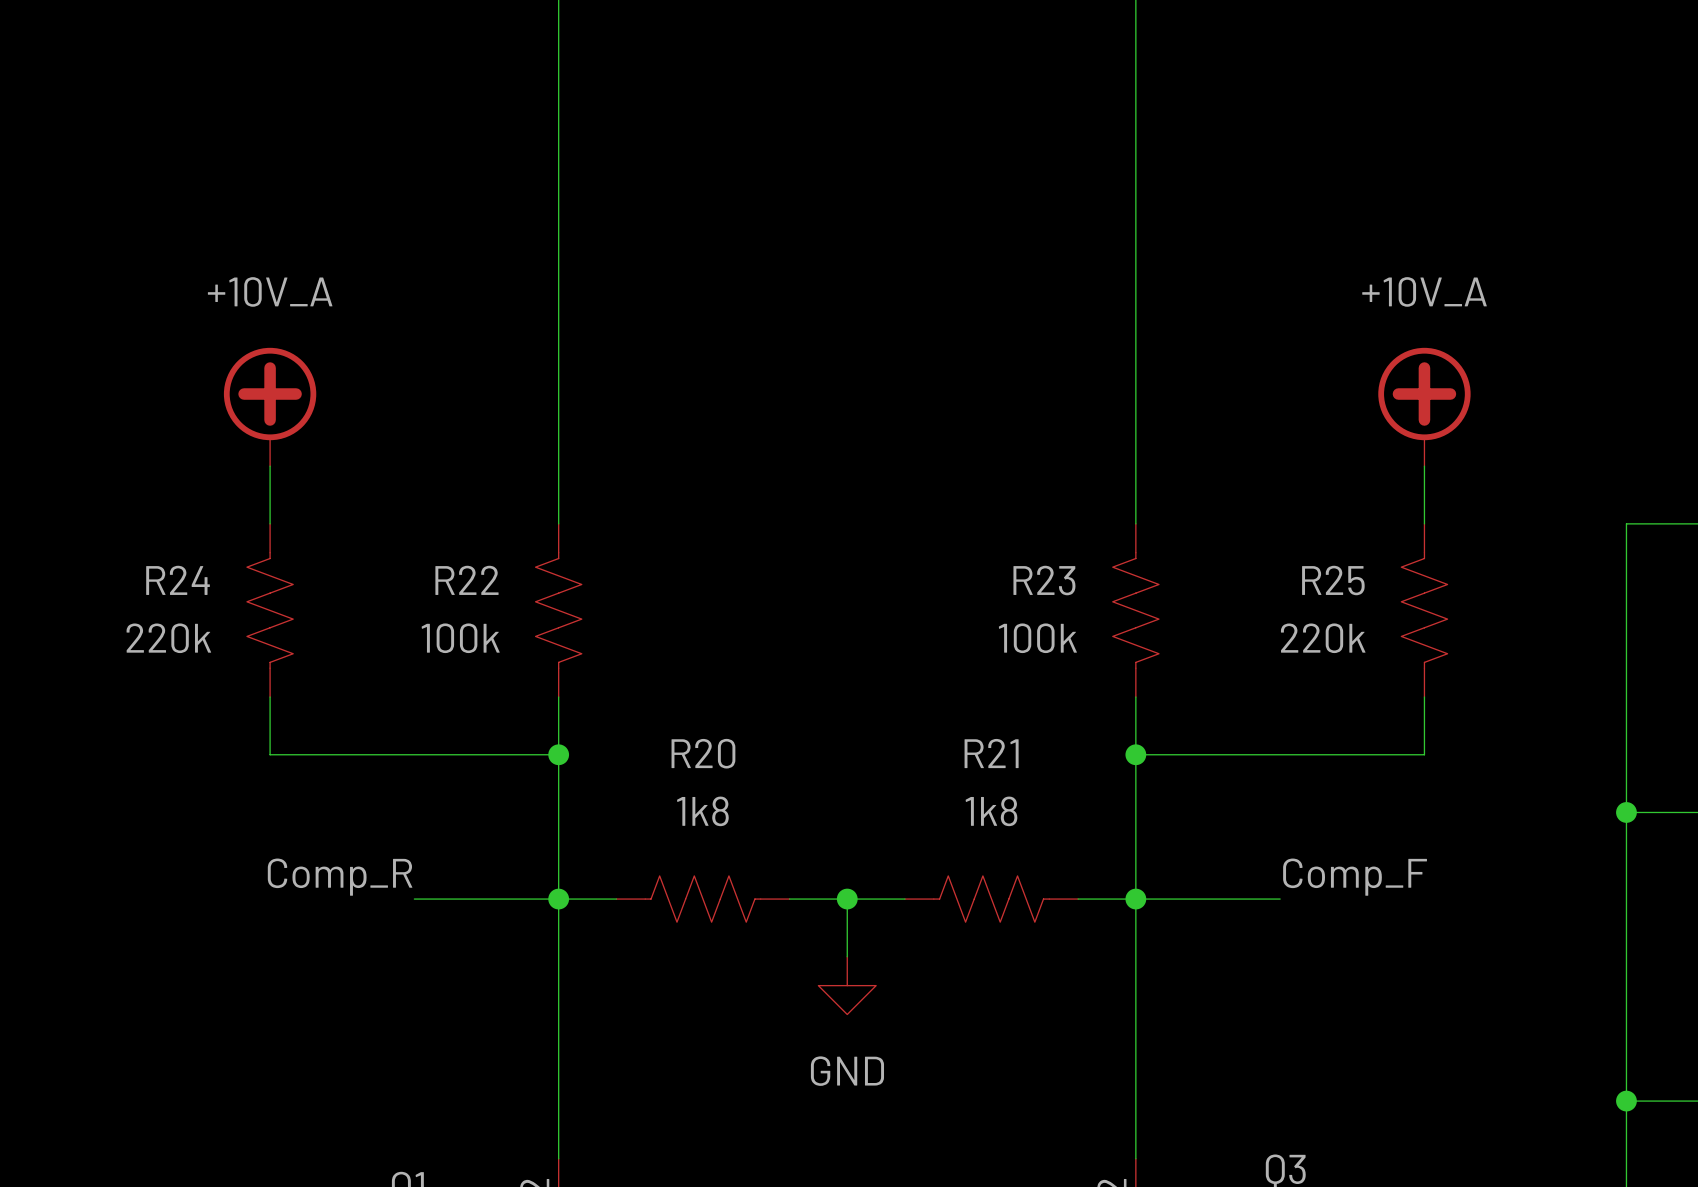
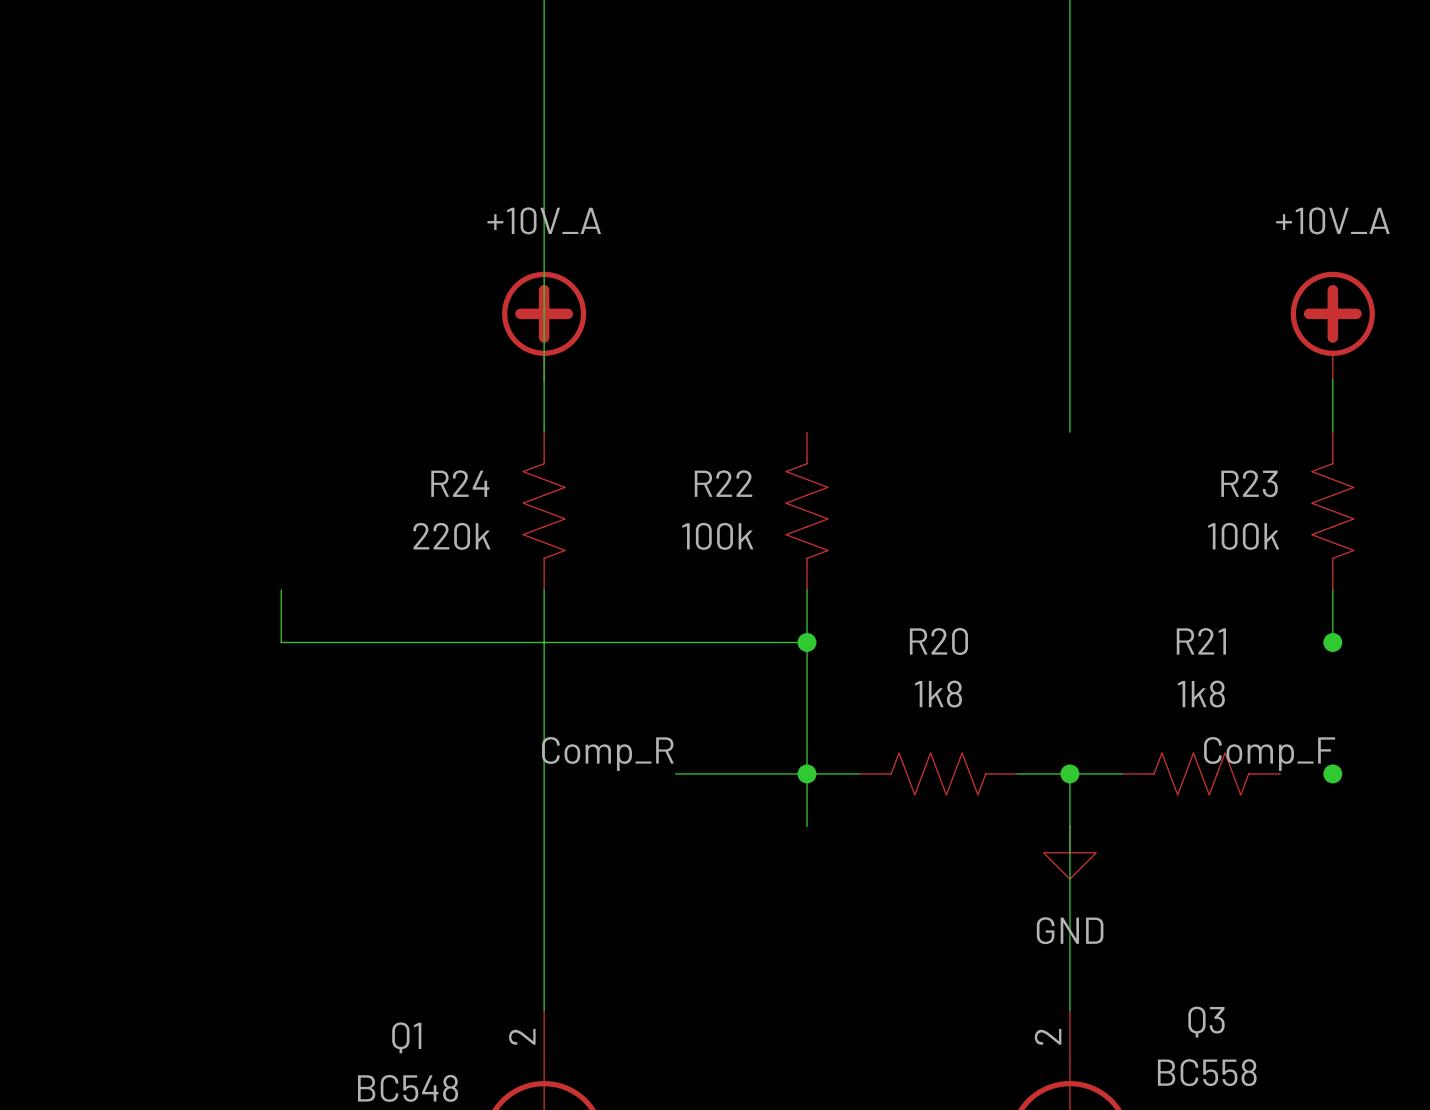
power symbol position: +10V_A (270, 407) -> +10V_A (544, 325)
wire: (270, 466) (270, 523) -> none
R22 name: R22 (466, 580) -> R24 (460, 483)
R25 name: R25 (1333, 580) -> R23 (1249, 483)
R24: 220k (270, 610) -> none
R22: none -> 100k (807, 511)
R23: 100k (1135, 610) -> none
R22 value: 100k (460, 638) -> 220k (451, 536)
R25 value: 220k (1323, 638) -> 100k (1243, 536)
wire: (1135, 697) (1135, 899) -> (807, 589) (807, 773)
R21 name: R21 (991, 753) -> R20 (938, 641)
wire: none -> (544, 642) (807, 642)
junction: (558, 754) -> none
junction: none -> (807, 642)
wire: (1135, 754) (1424, 754) -> none
junction: (1135, 754) -> none
junction: none -> (1332, 642)
label position: Comp_R (340, 877) -> Comp_R (607, 753)
wire: (414, 899) (616, 899) -> none
junction: (558, 899) -> none
R20: 1k8 (702, 899) -> none
wire: (1193, 899) (1280, 899) -> (675, 773) (754, 773)
R21: none -> 1k8 (1201, 773)
junction: none -> (1332, 773)
power symbol position: GND (847, 985) -> GND (1069, 852)

